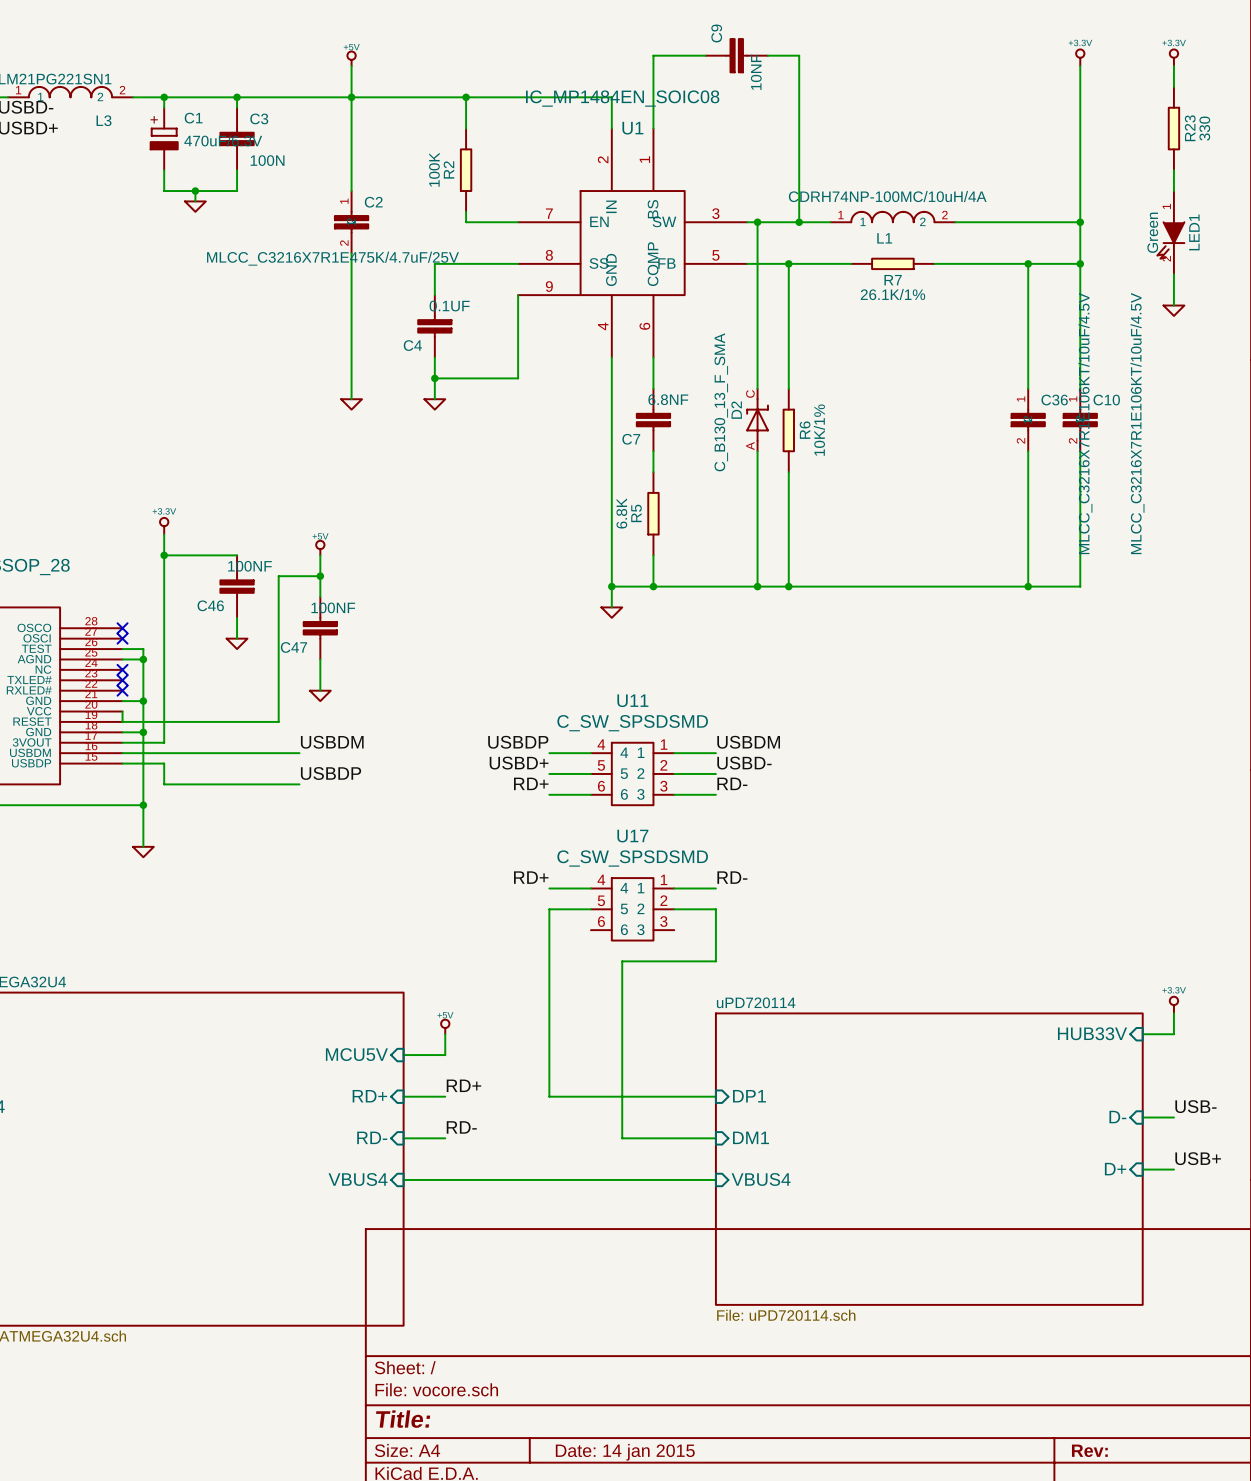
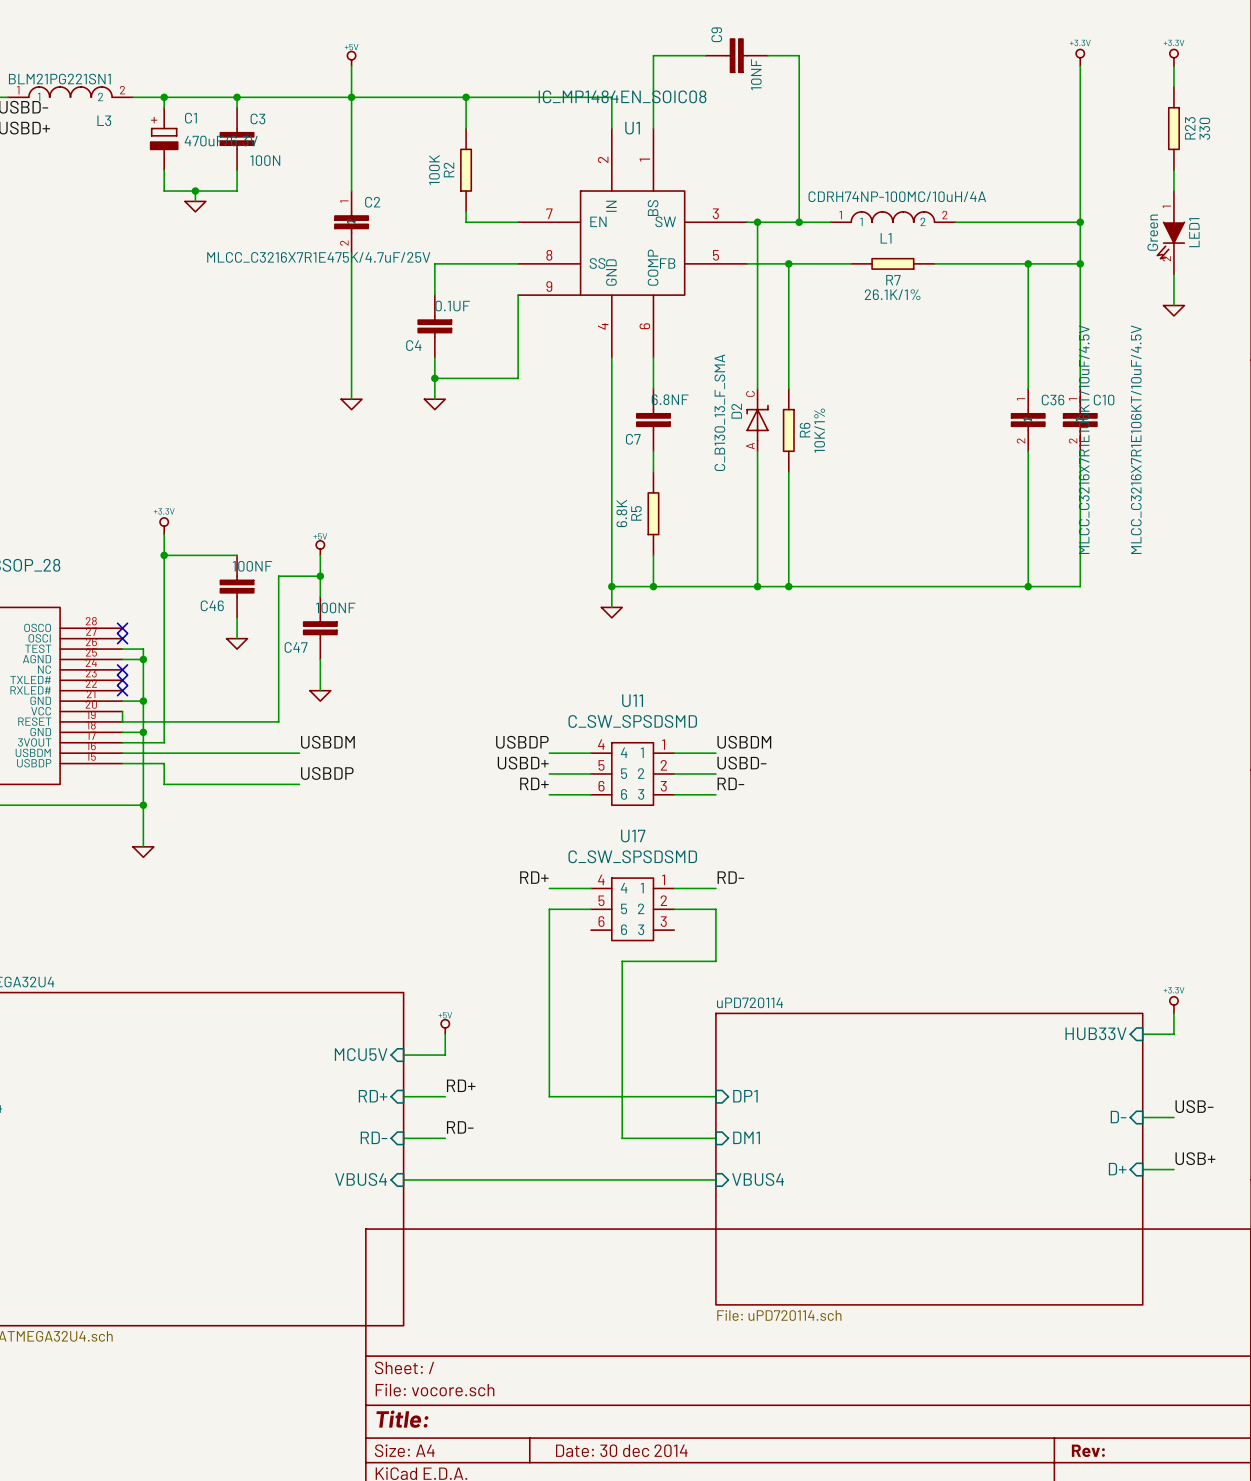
title block: Date: 14 jan 2015 (625, 1452) -> Date: 30 dec 2014 (621, 1450)

